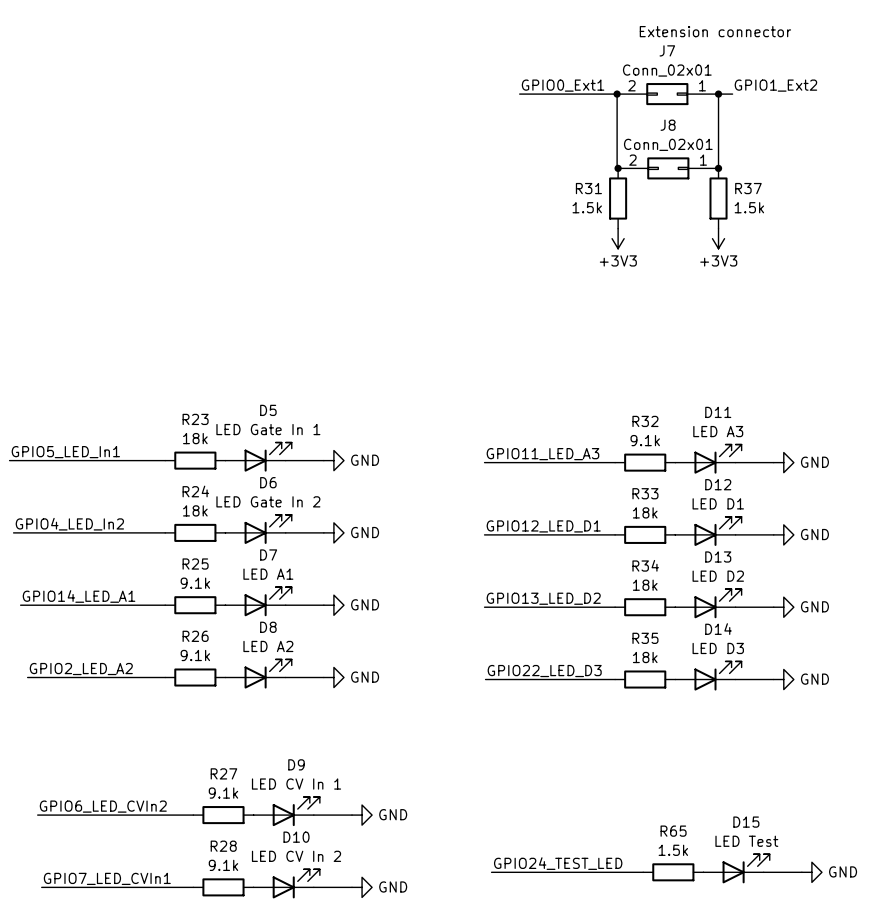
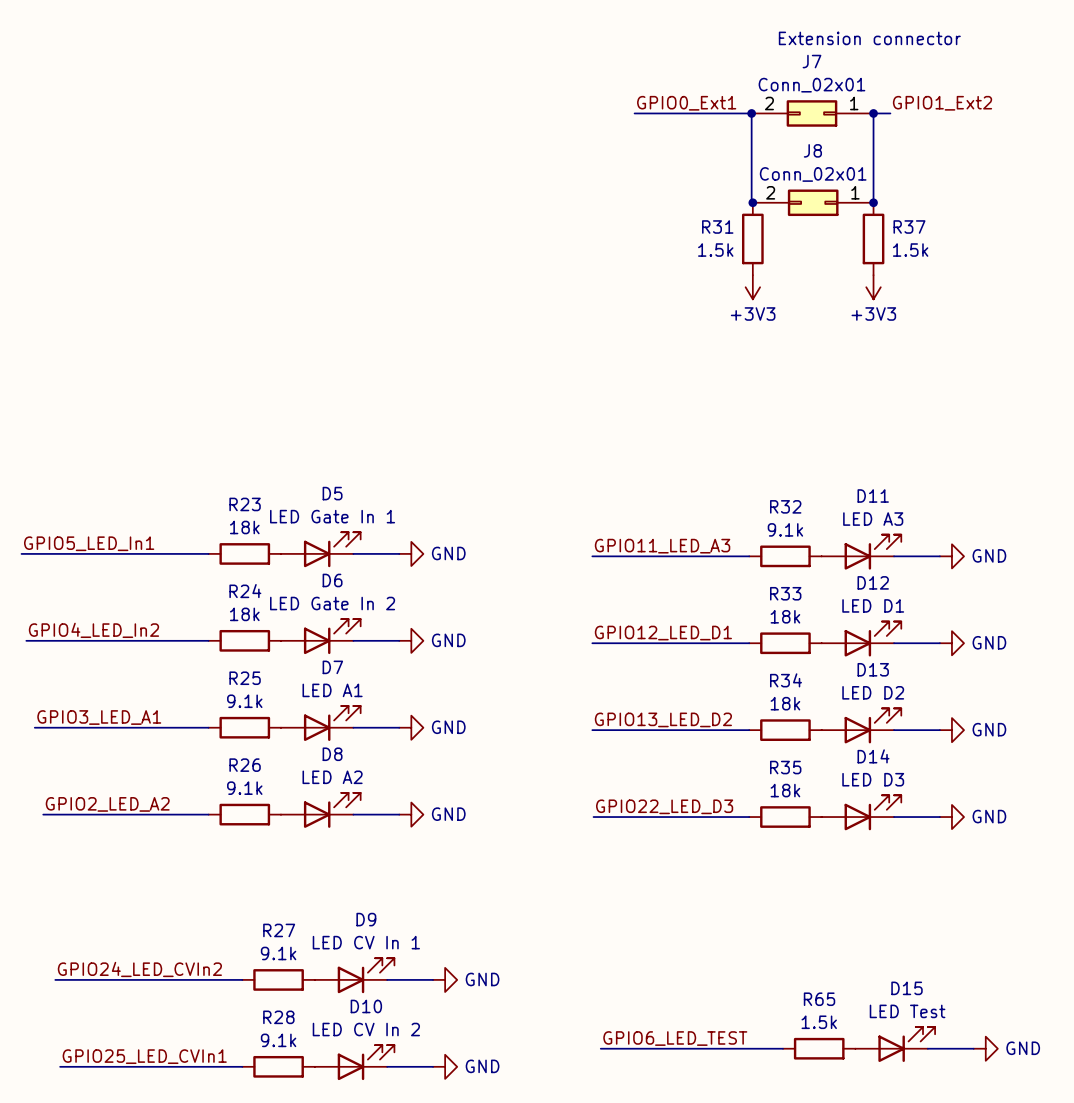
label: GPIO14_LED_A1 (79, 596) -> GPIO3_LED_A1 (99, 717)
label: GPIO6_LED_CVIn2 (103, 806) -> GPIO24_LED_CVIn2 (139, 969)
label: GPIO24_TEST_LED (558, 863) -> GPIO6_LED_TEST (675, 1038)
label: GPIO7_LED_CVIn1 (107, 878) -> GPIO25_LED_CVIn1 (144, 1056)

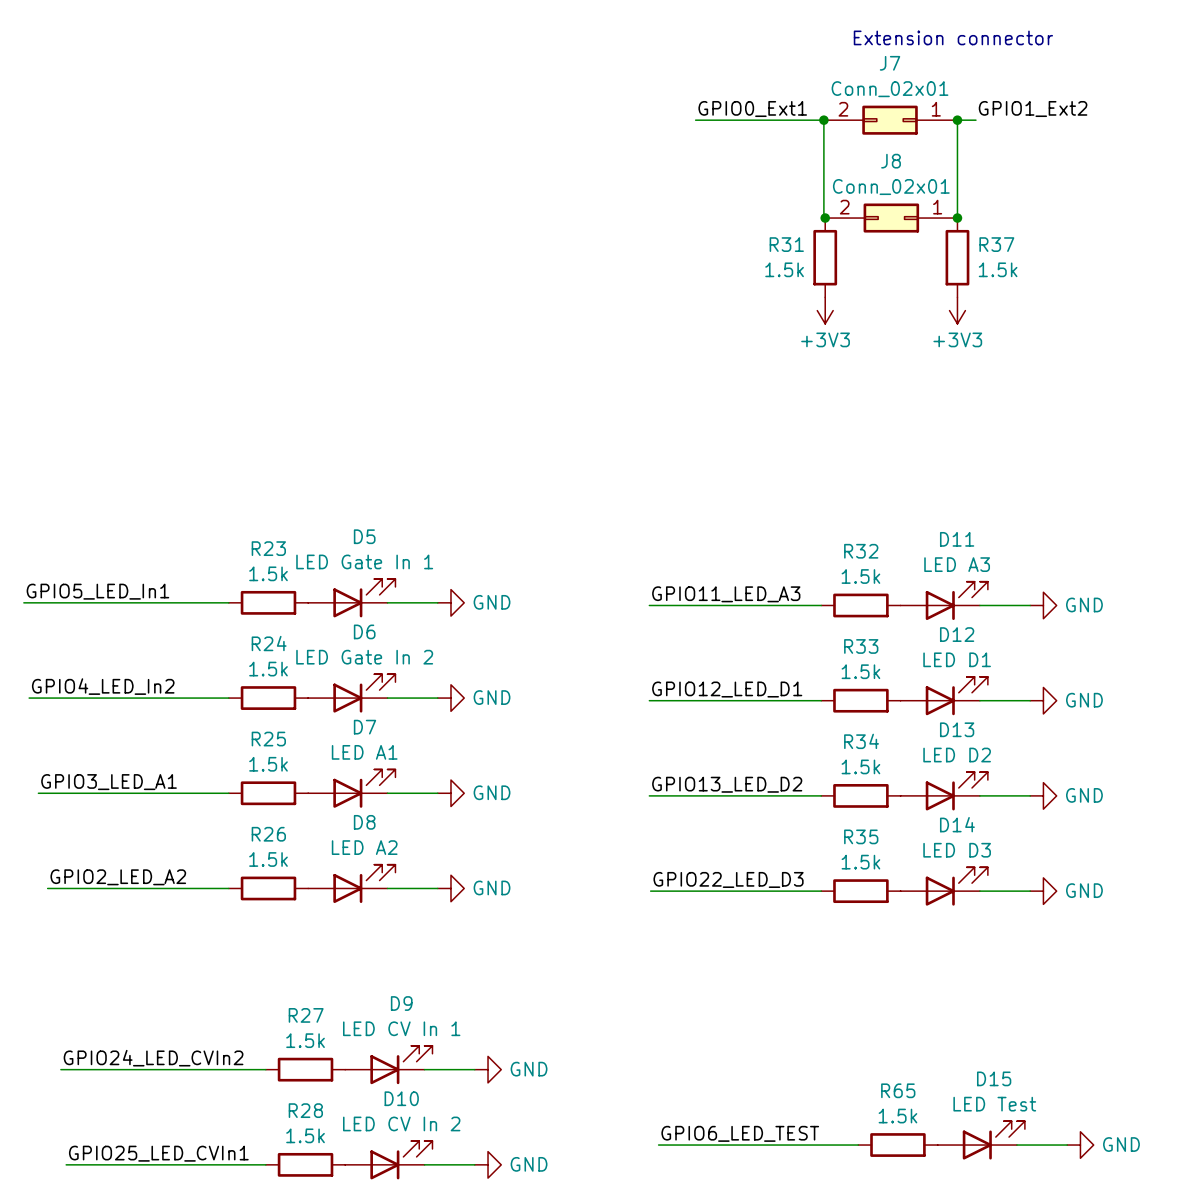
R23 value: 18k (244, 527) -> 1.5k (268, 573)
R32 value: 9.1k (785, 529) -> 1.5k (860, 576)
R24 value: 18k (244, 614) -> 1.5k (268, 669)
R33 value: 18k (785, 616) -> 1.5k (860, 671)
R25 value: 9.1k (244, 701) -> 1.5k (268, 764)
R34 value: 18k (785, 703) -> 1.5k (860, 766)
R26 value: 9.1k (244, 788) -> 1.5k (268, 859)
R35 value: 18k (785, 790) -> 1.5k (860, 862)
R27 value: 9.1k (278, 953) -> 1.5k (305, 1040)
R28 value: 9.1k (278, 1040) -> 1.5k (305, 1135)

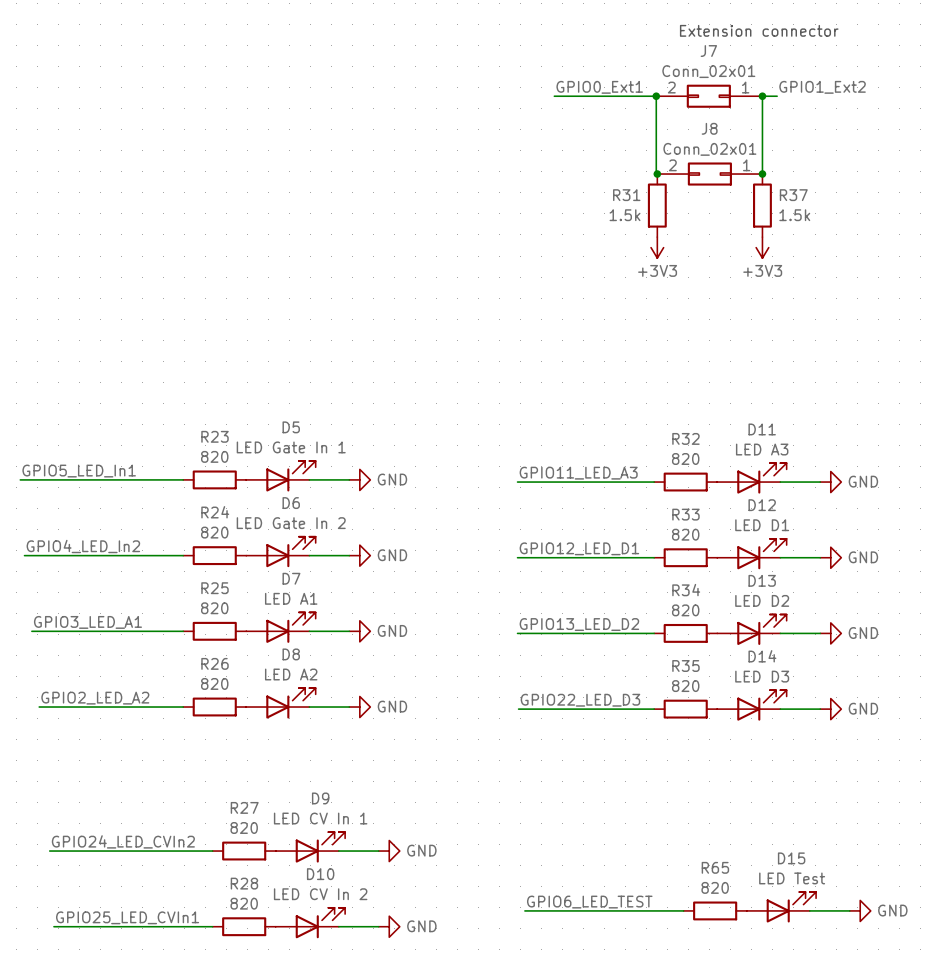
R23 value: 1.5k (268, 573) -> 820 (214, 456)
R32 value: 1.5k (860, 576) -> 820 (685, 458)
R24 value: 1.5k (268, 669) -> 820 (214, 532)
R33 value: 1.5k (860, 671) -> 820 (685, 534)
R25 value: 1.5k (268, 764) -> 820 (214, 608)
R34 value: 1.5k (860, 766) -> 820 (685, 610)
R26 value: 1.5k (268, 859) -> 820 (214, 683)
R35 value: 1.5k (860, 862) -> 820 (685, 686)
R27 value: 1.5k (305, 1040) -> 820 (244, 827)
R65 value: 1.5k (897, 1116) -> 820 (715, 887)
R28 value: 1.5k (305, 1135) -> 820 (244, 903)

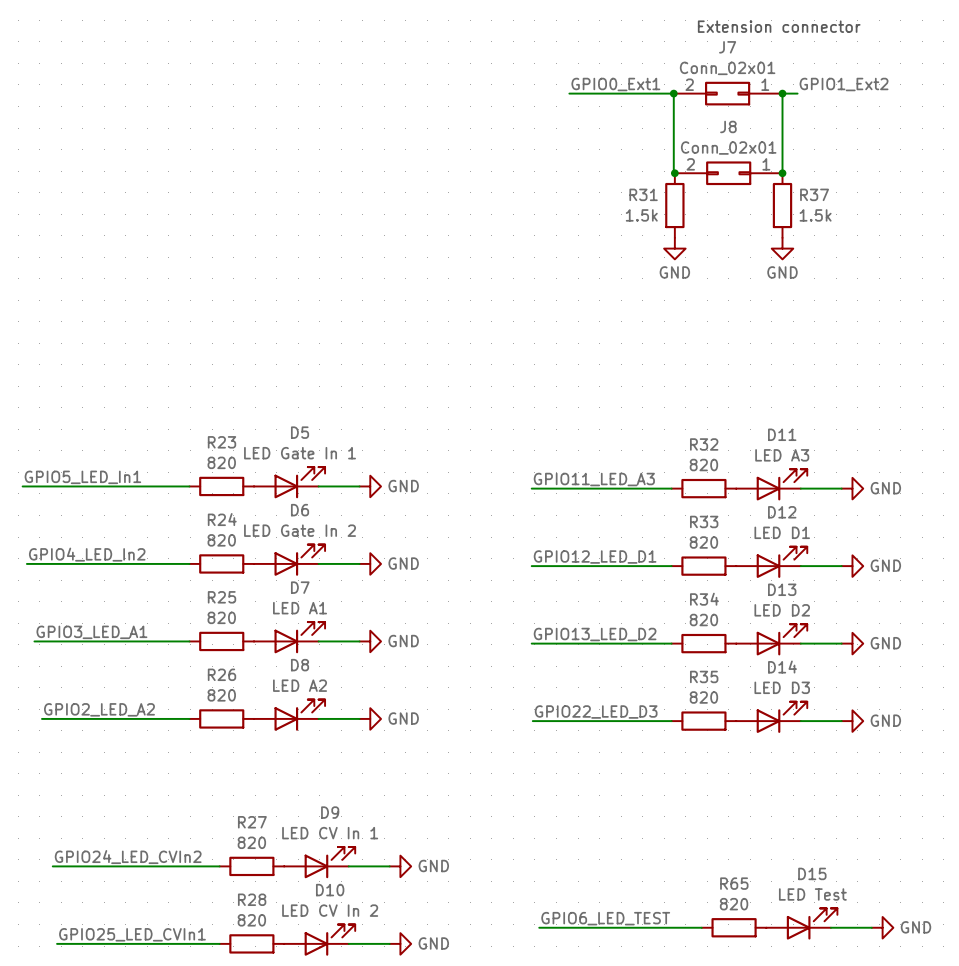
power symbol: +3V3 (657, 247) -> GND (674, 248)
power symbol: +3V3 (762, 247) -> GND (782, 248)

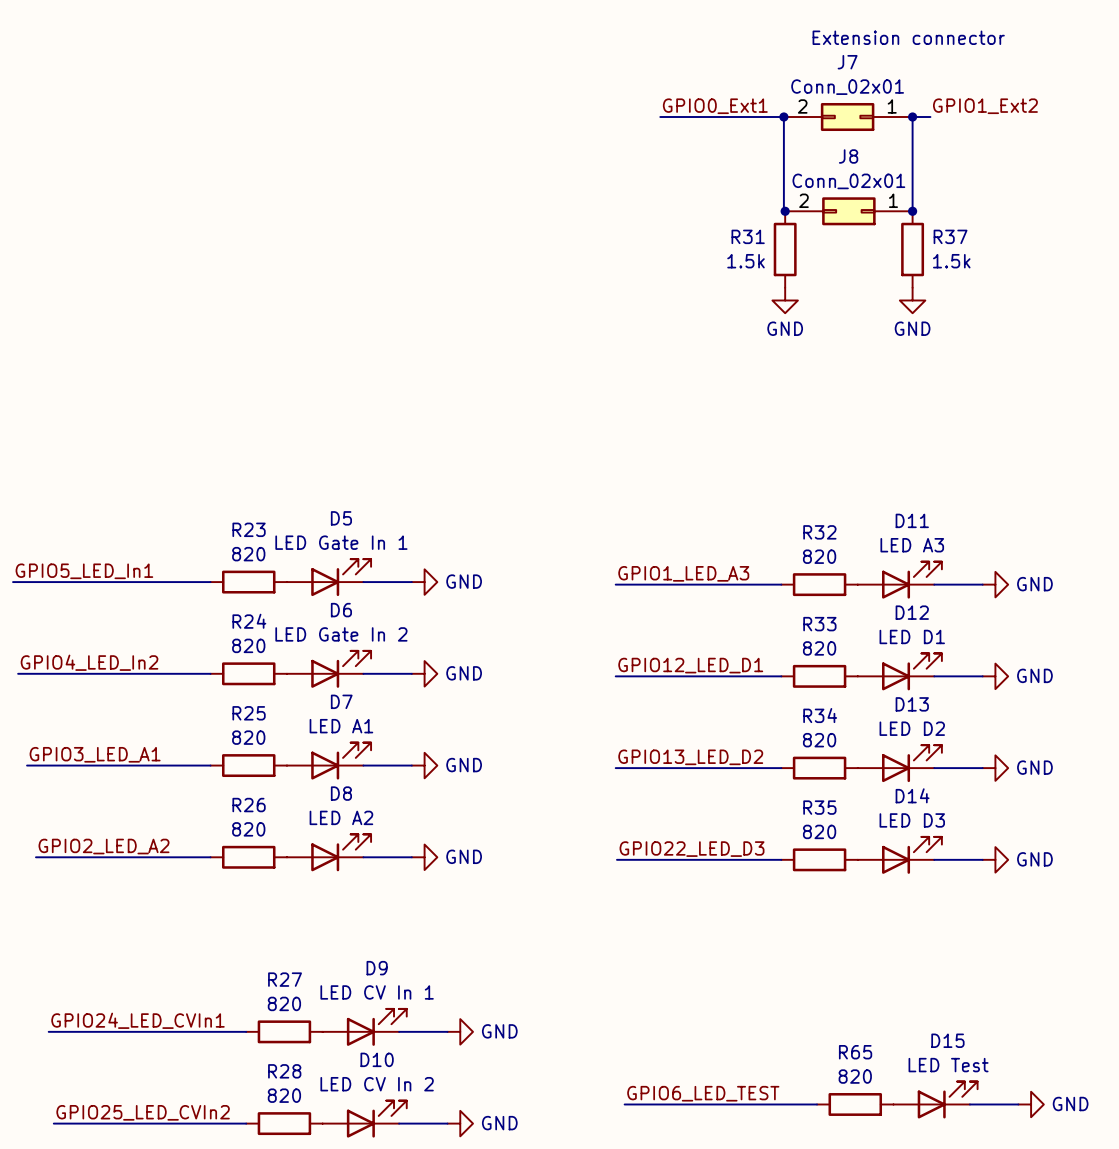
label: GPIO11_LED_A3 (594, 479) -> GPIO1_LED_A3 (683, 573)
label: GPIO24_LED_CVIn2 (128, 857) -> GPIO24_LED_CVIn1 (137, 1020)
label: GPIO25_LED_CVIn1 (132, 934) -> GPIO25_LED_CVIn2 (143, 1112)

